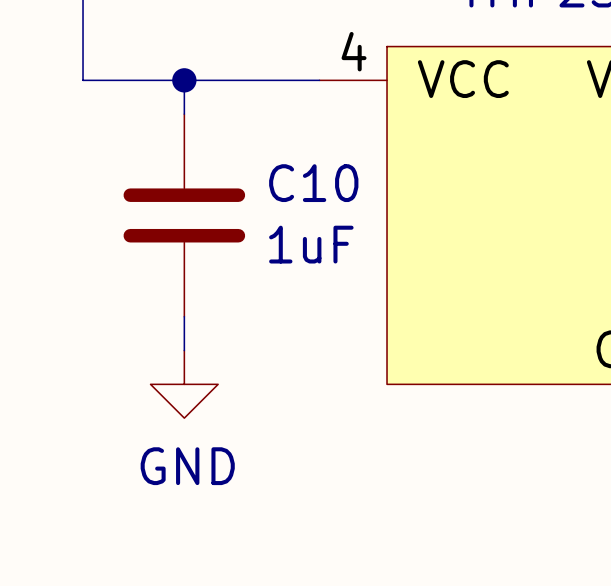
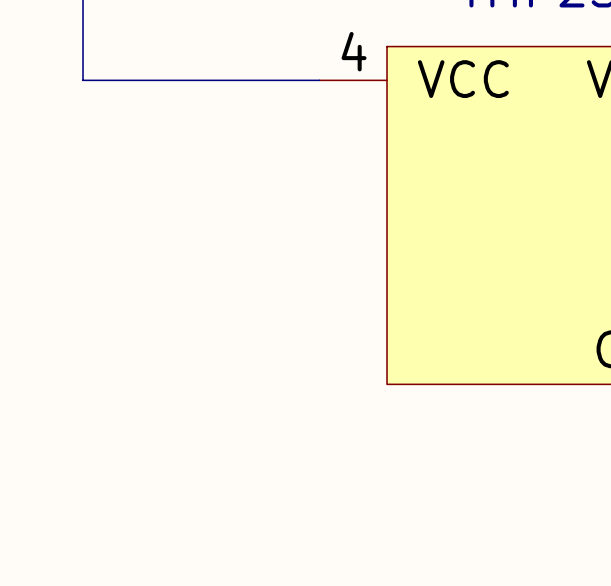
wire: (184, 80) (184, 114) -> none
junction: (184, 80) -> none
C10: 1uF (184, 215) -> none
wire: (184, 316) (184, 350) -> none
power symbol: GND (184, 384) -> none

